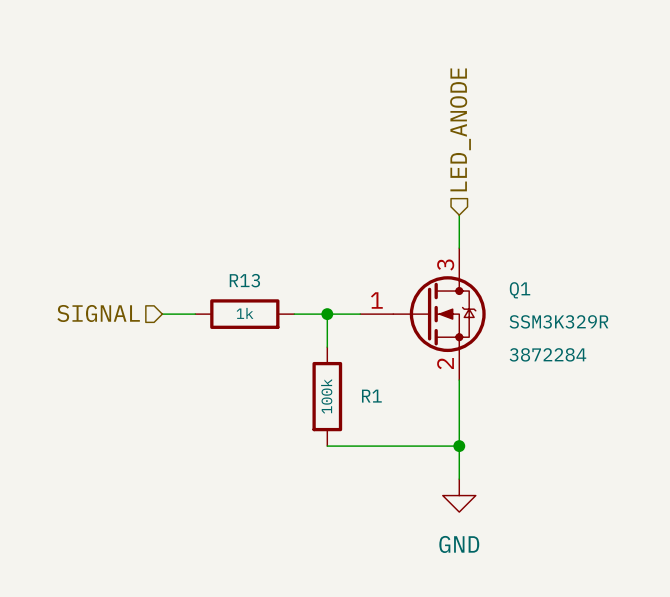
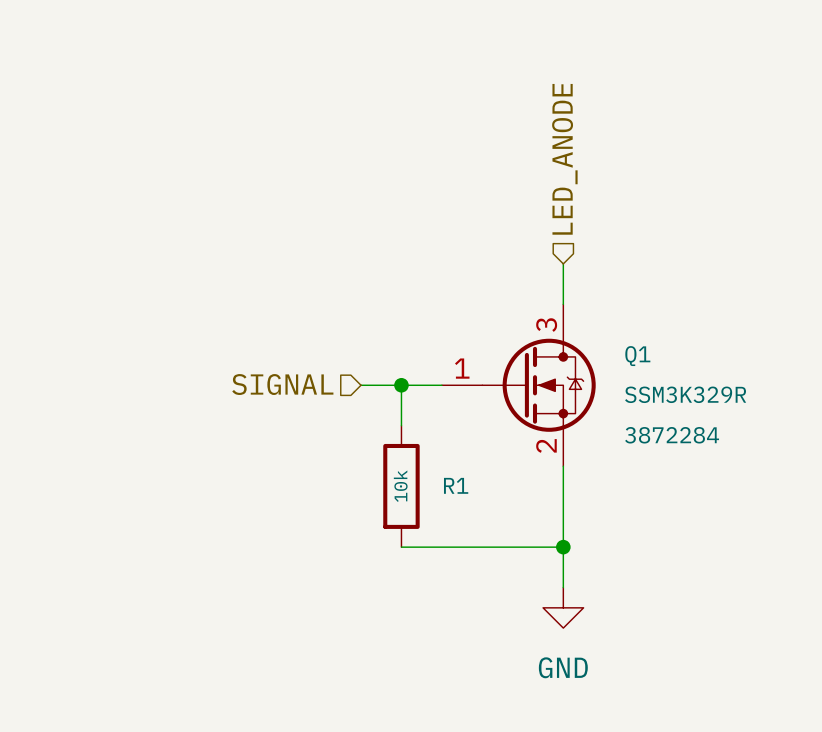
hierarchical label position: SIGNAL (98, 313) -> SIGNAL (282, 384)
wire: (162, 314) (195, 314) -> none
R13: 1k (244, 314) -> none
R1 value: 100k (326, 396) -> 10k (400, 486)

